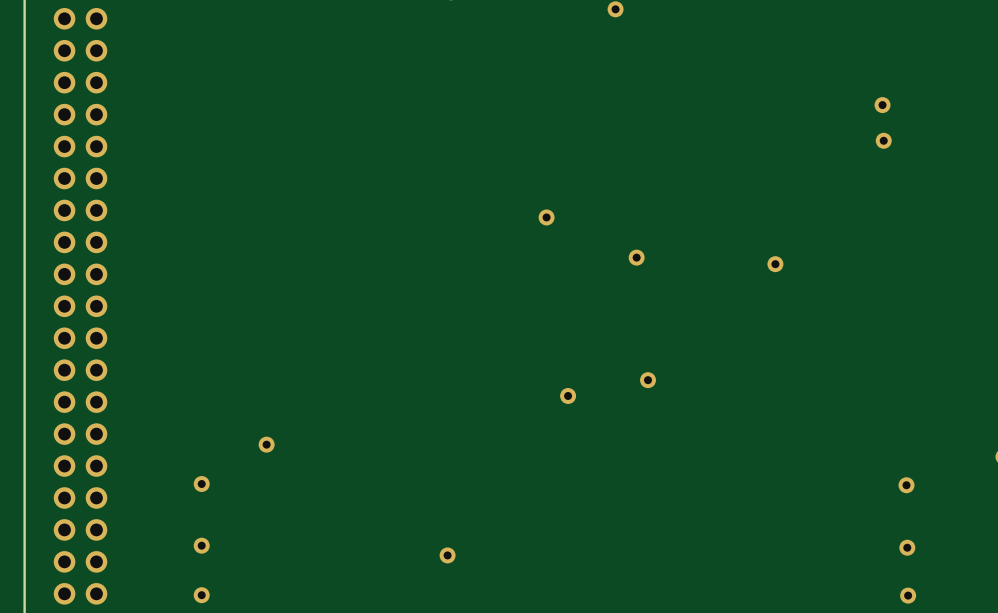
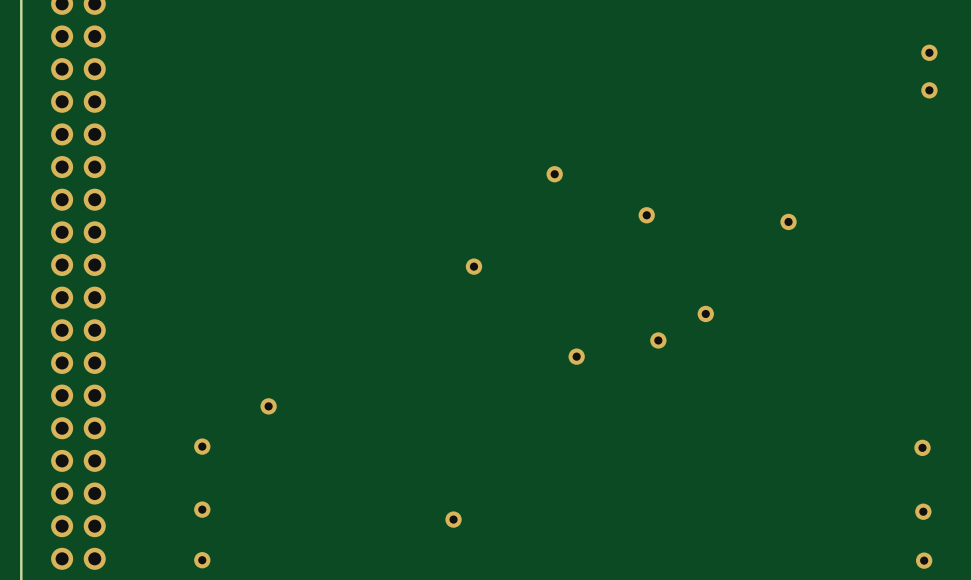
part: none -> (929, 52)
part: (882, 105) -> none
part: none -> (929, 90)
part: (883, 140) -> none
part: none -> (473, 266)
part: none -> (705, 313)

